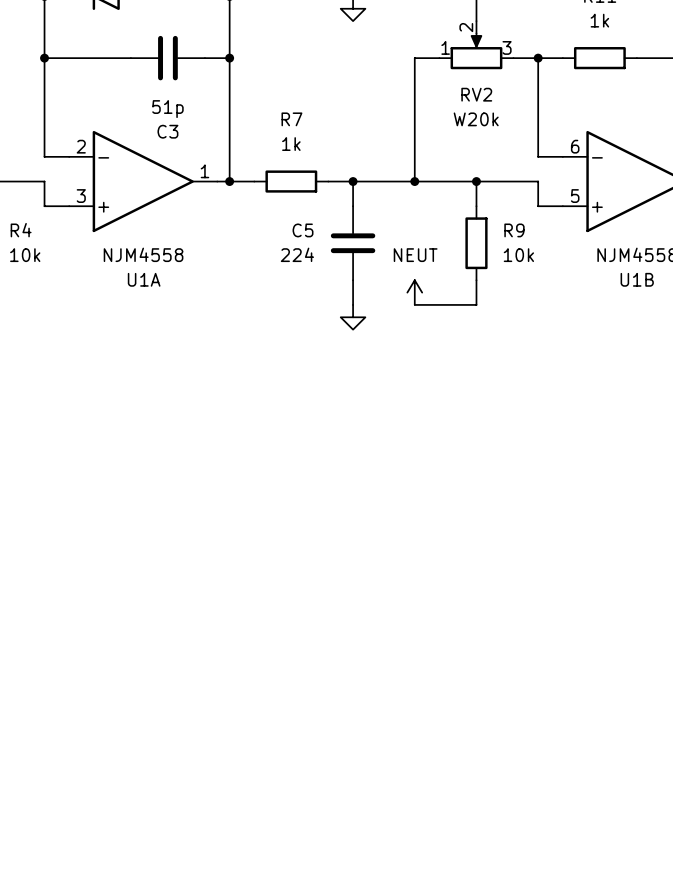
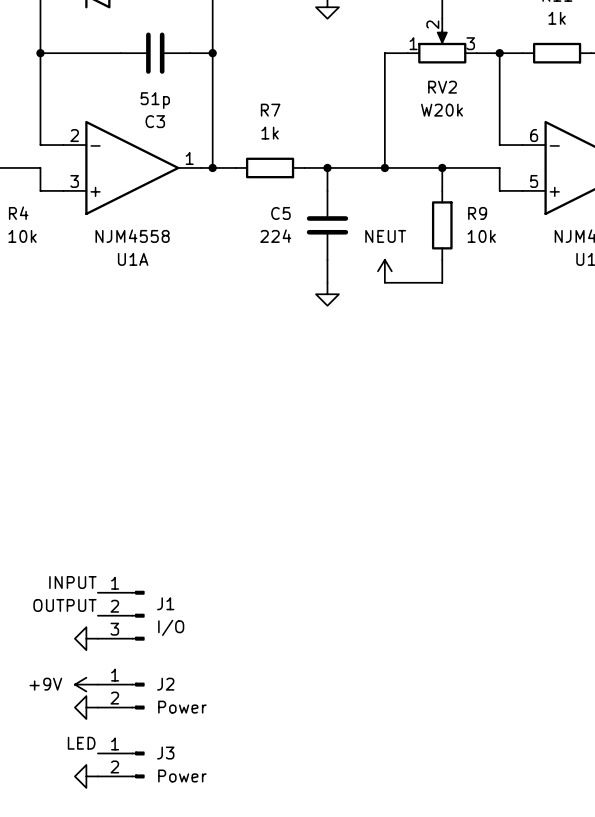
label: none -> INPUT (72, 582)
label: none -> OUTPUT (64, 605)
J1: none -> I/O (121, 615)
power symbol: none -> (86, 638)
power symbol: none -> +9V (86, 684)
J2: none -> Power (121, 696)
power symbol: none -> (86, 707)
label: none -> LED (81, 743)
J3: none -> Power (121, 764)
power symbol: none -> (86, 776)

